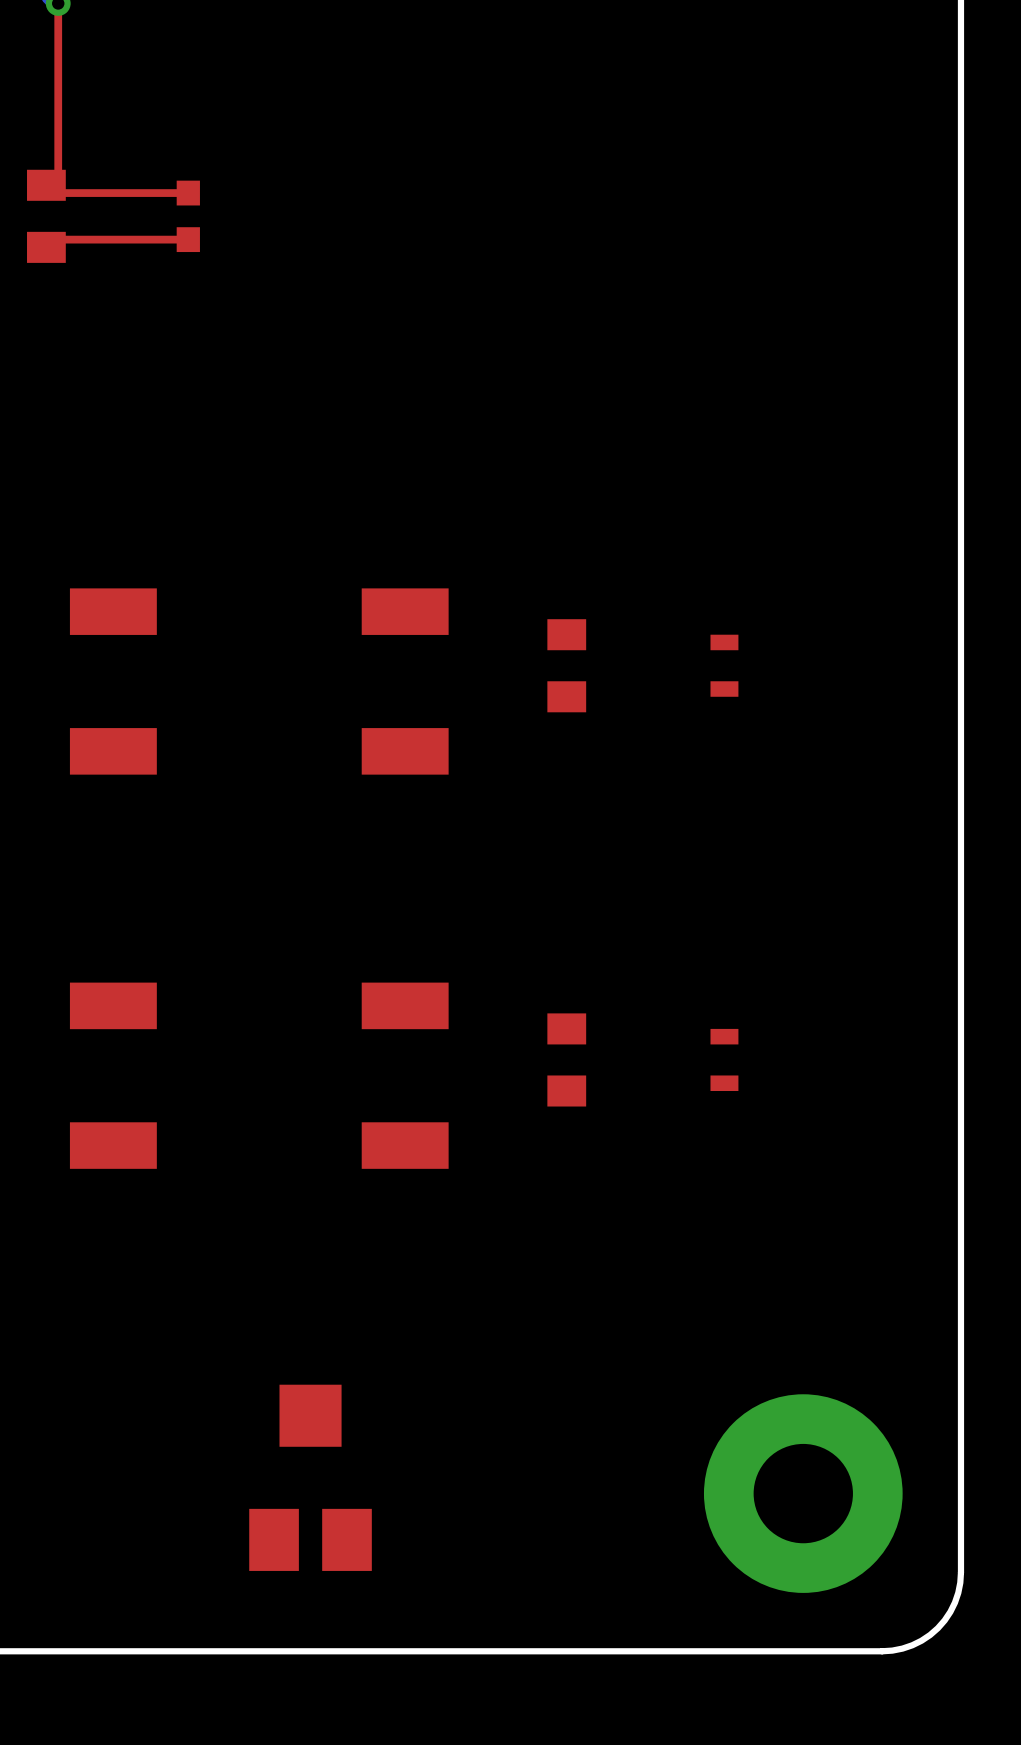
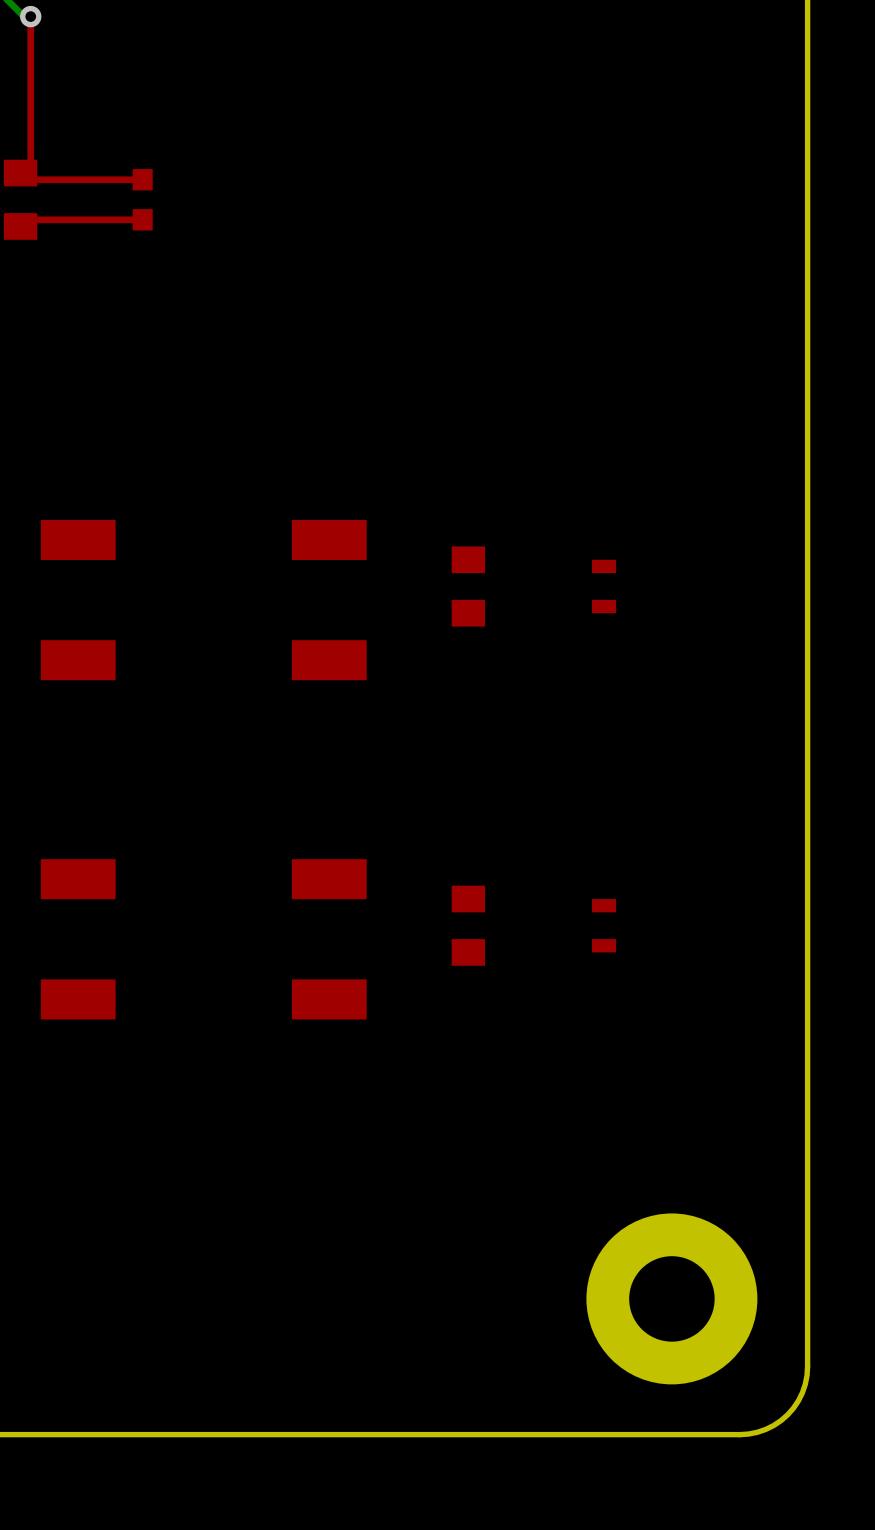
part: (310, 1477) -> none

